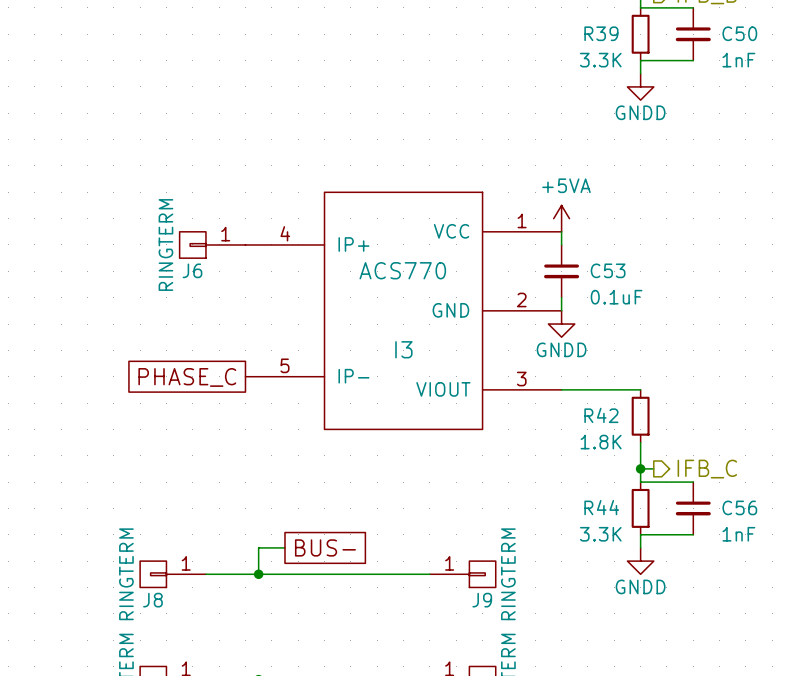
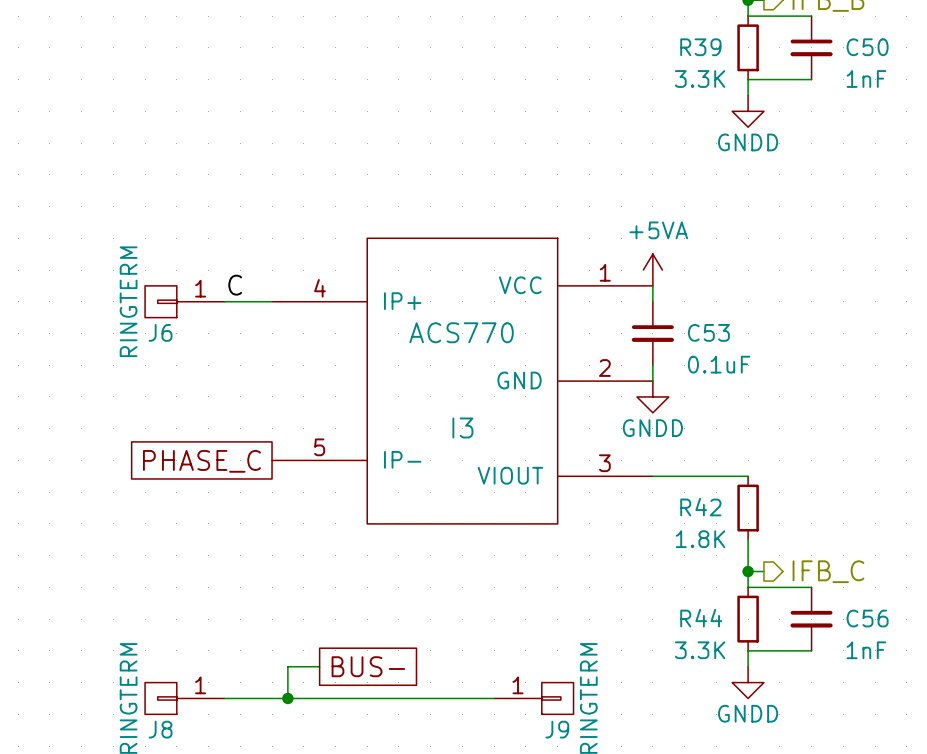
label: none -> C (235, 285)
J6 position: (212, 244) -> (184, 301)

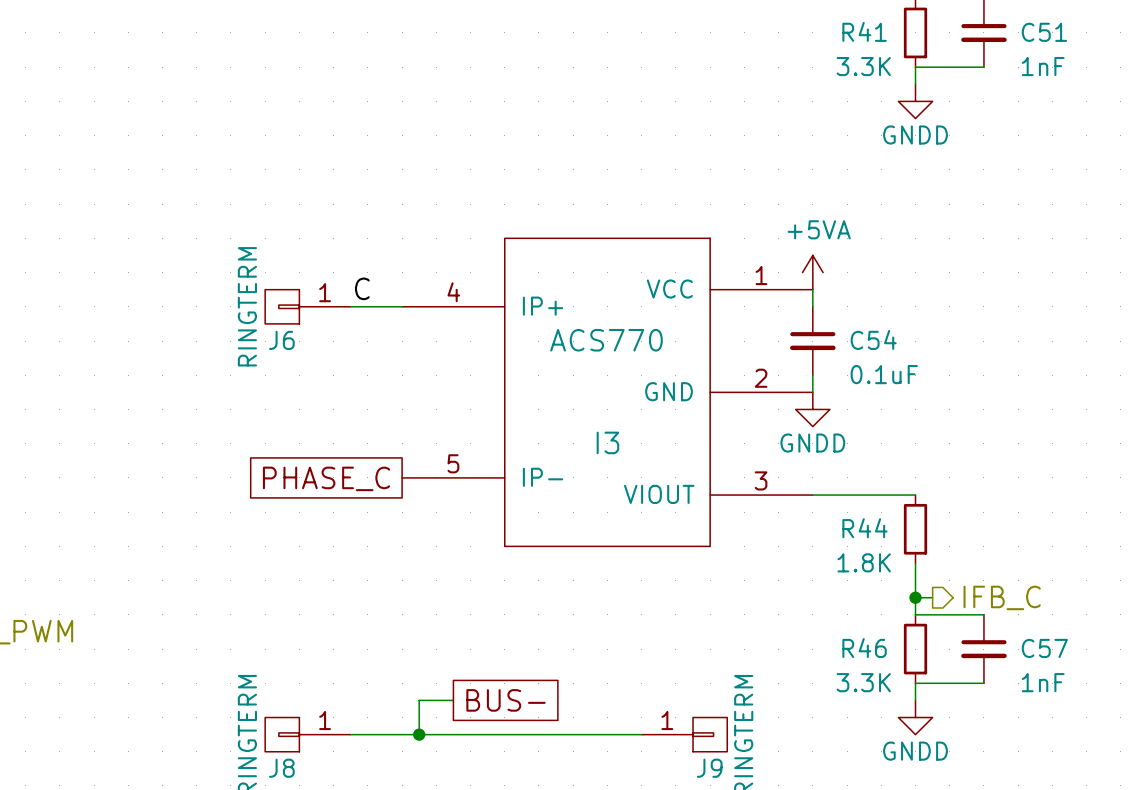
R39 name: R39 (700, 47) -> R41 (864, 31)
C50 name: C50 (867, 47) -> C51 (1044, 32)
C53 name: C53 (708, 332) -> C54 (873, 339)
R42 name: R42 (700, 507) -> R44 (864, 528)
R44 name: R44 (701, 618) -> R46 (864, 648)
C56 name: C56 (867, 618) -> C57 (1044, 648)

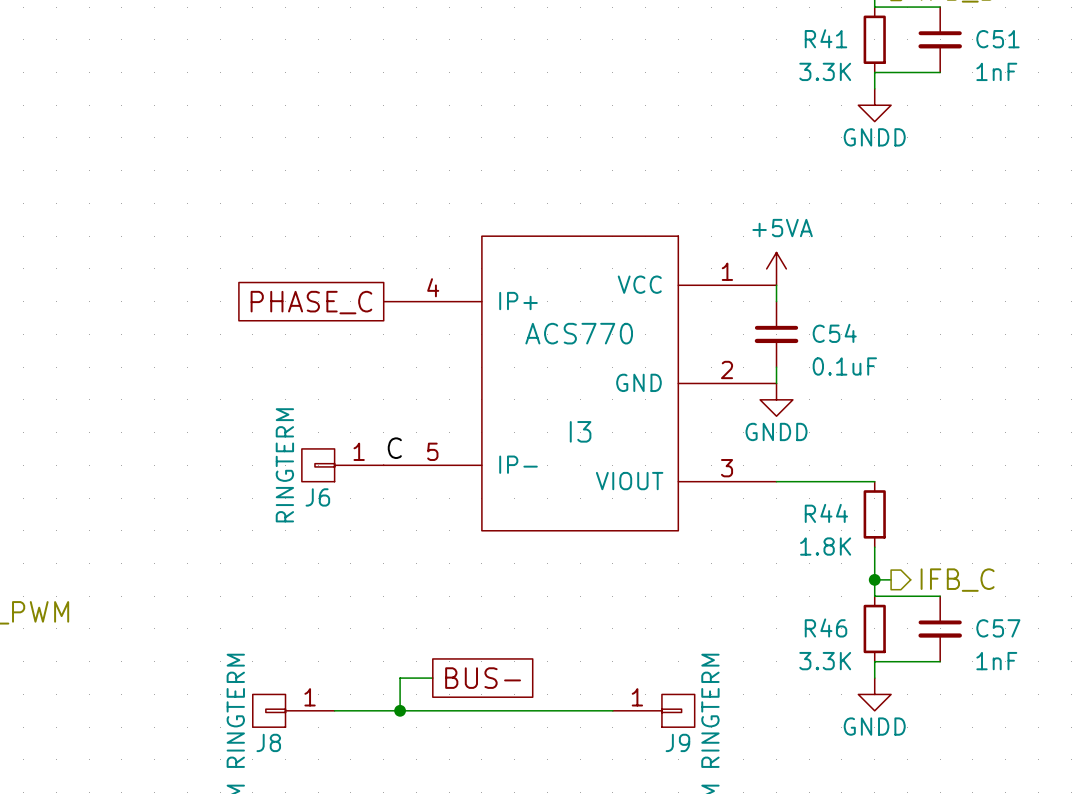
label position: C (362, 288) -> C (394, 448)
J6 position: (307, 306) -> (342, 465)
wire: (350, 306) (402, 306) -> none
global label position: PHASE_C (326, 478) -> PHASE_C (311, 302)

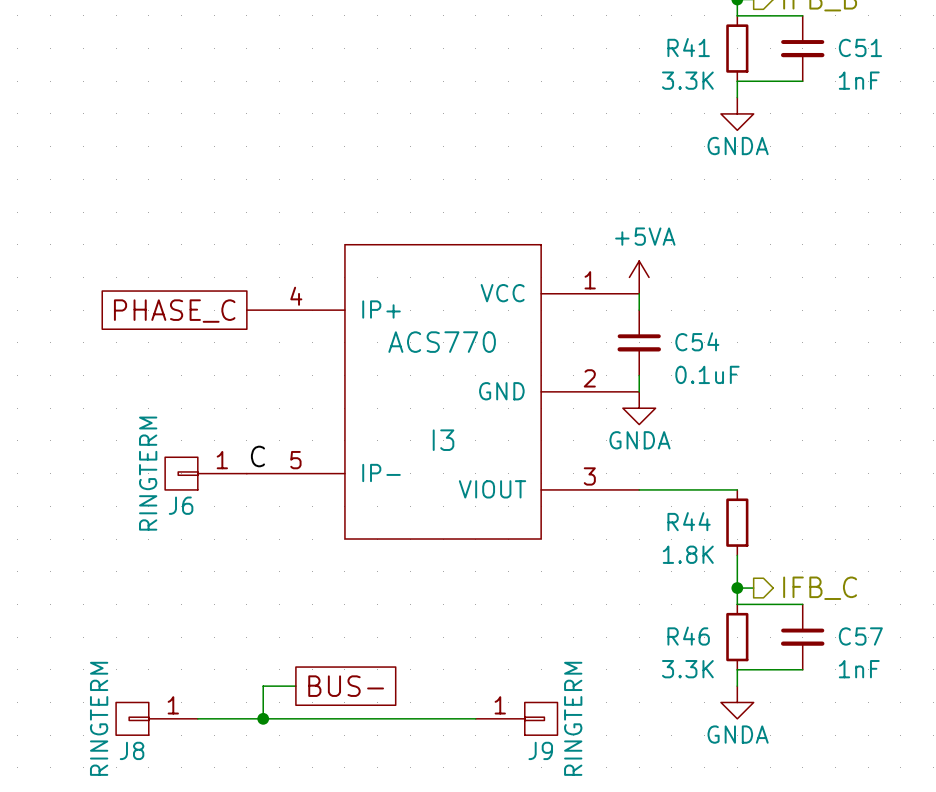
power symbol: GNDD (874, 105) -> GNDA (737, 113)
power symbol: GNDD (776, 399) -> GNDA (639, 408)
power symbol: GNDD (874, 694) -> GNDA (737, 702)

